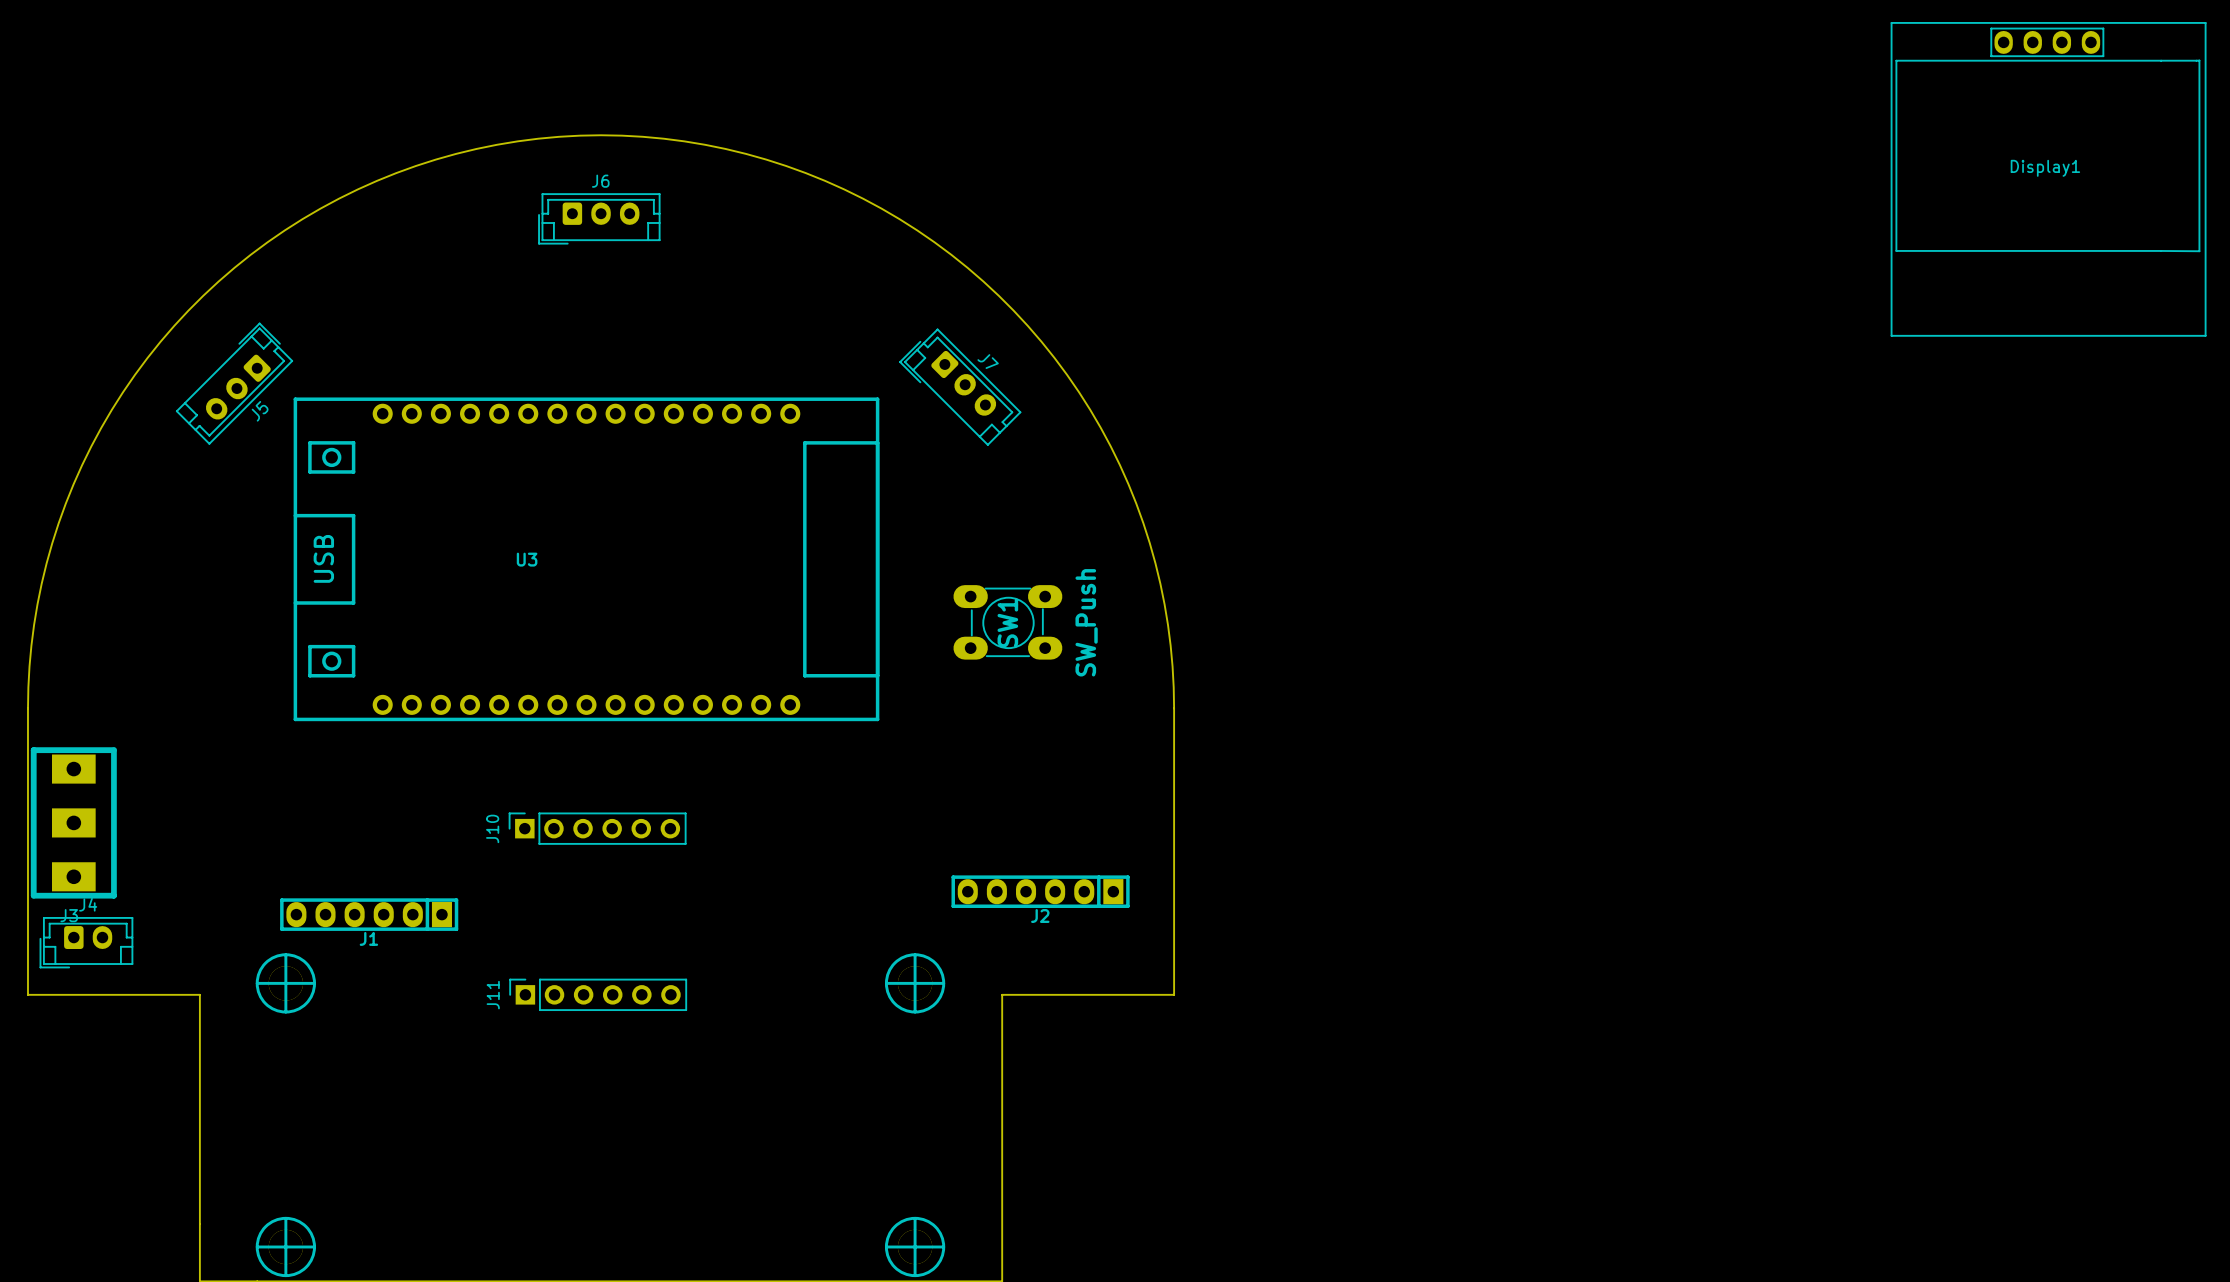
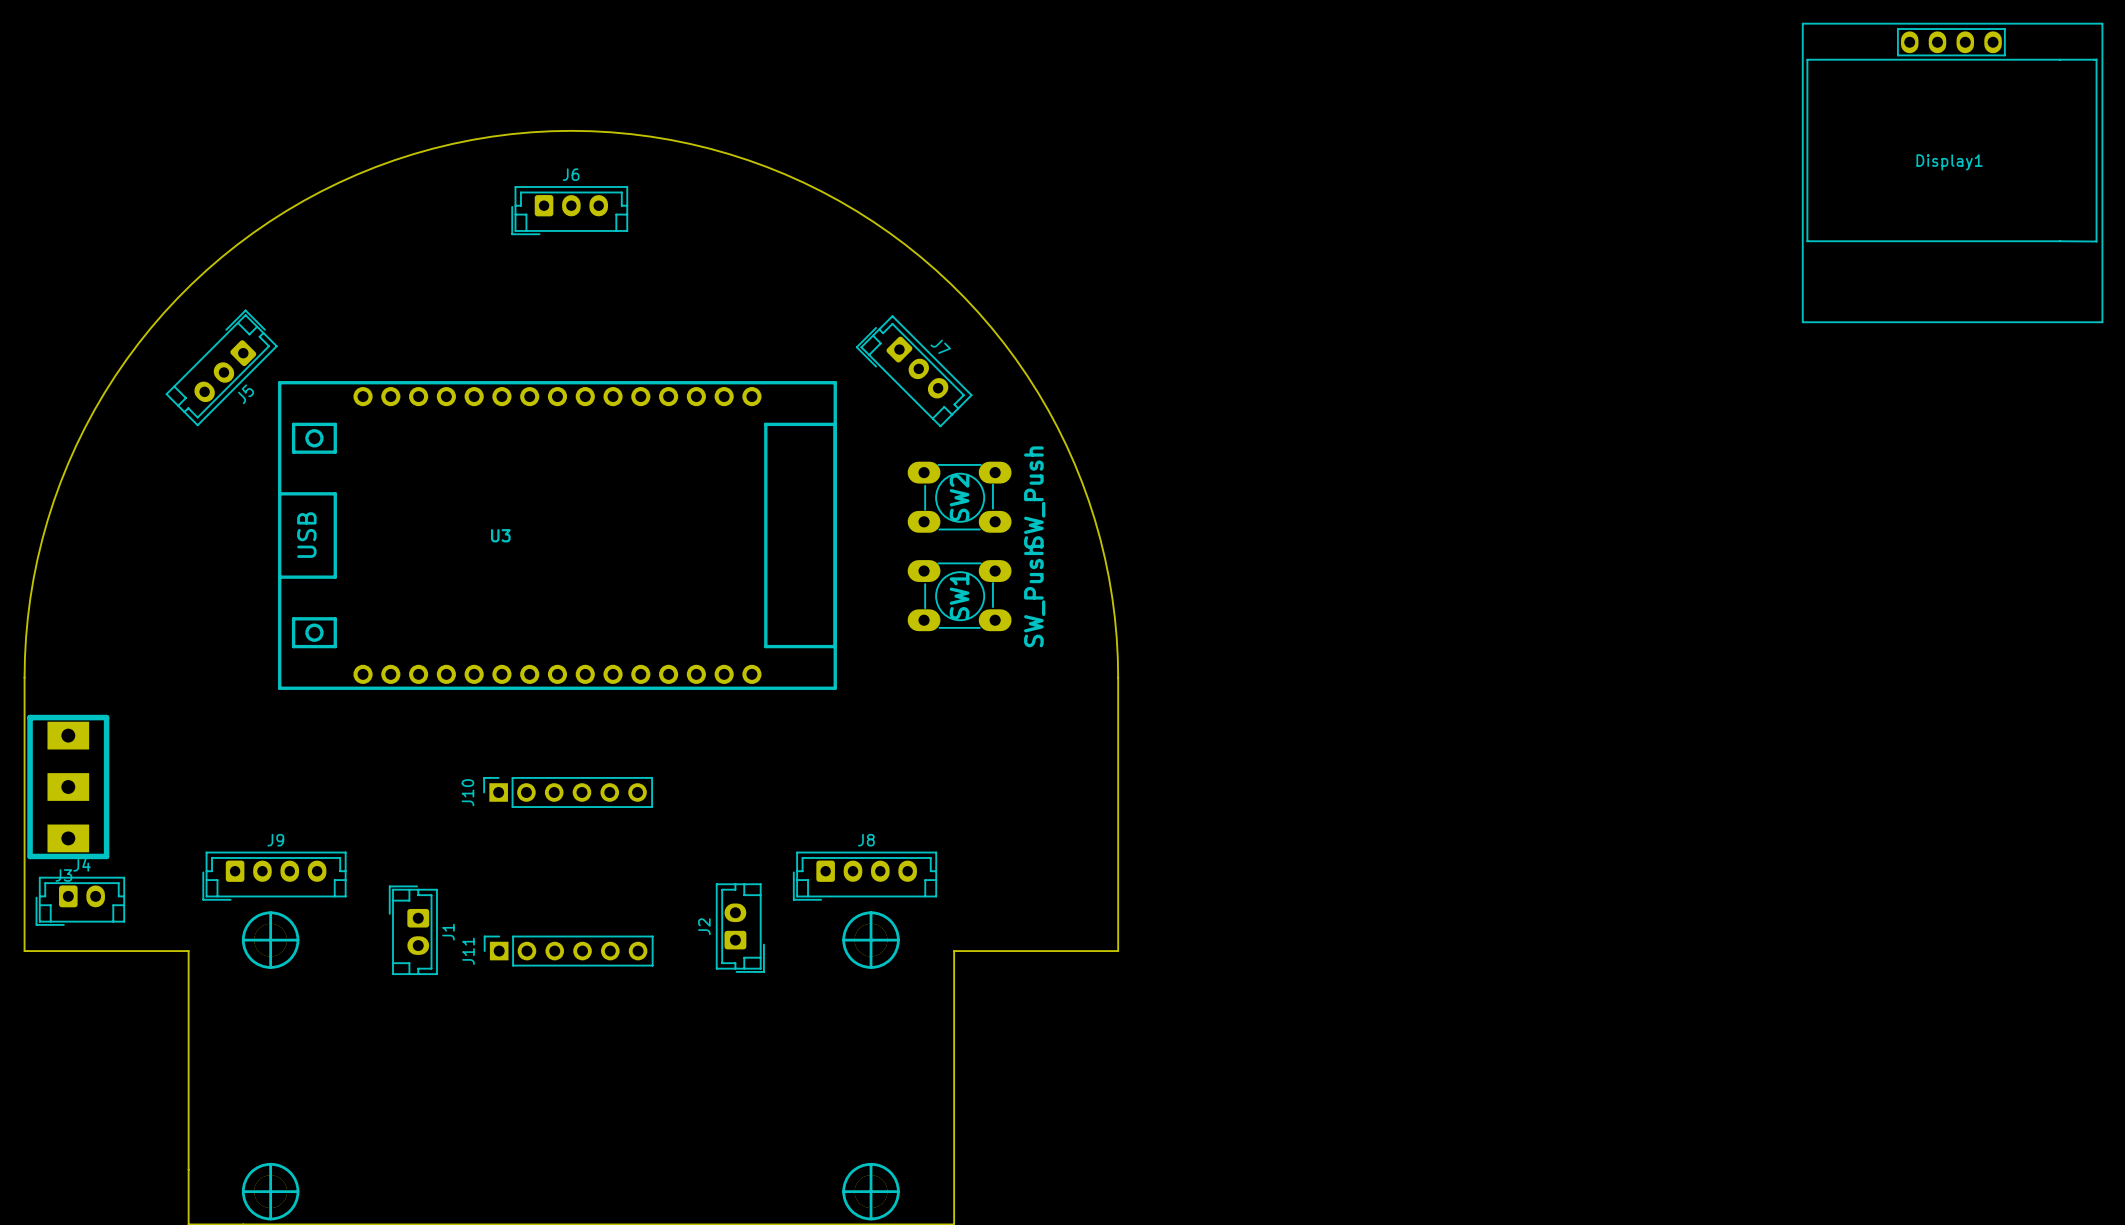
SW2: none -> SW_Push (959, 497)
J2 footprint: [951, 875, 1130, 908] -> [716, 883, 765, 973]
J1 footprint: [280, 898, 459, 931] -> [389, 885, 438, 975]
J9: none -> (274, 876)
J8: none -> (865, 876)
J2 name position: J2 (1040, 916) -> J2 (704, 926)
J1 name position: J1 (368, 938) -> J1 (448, 932)

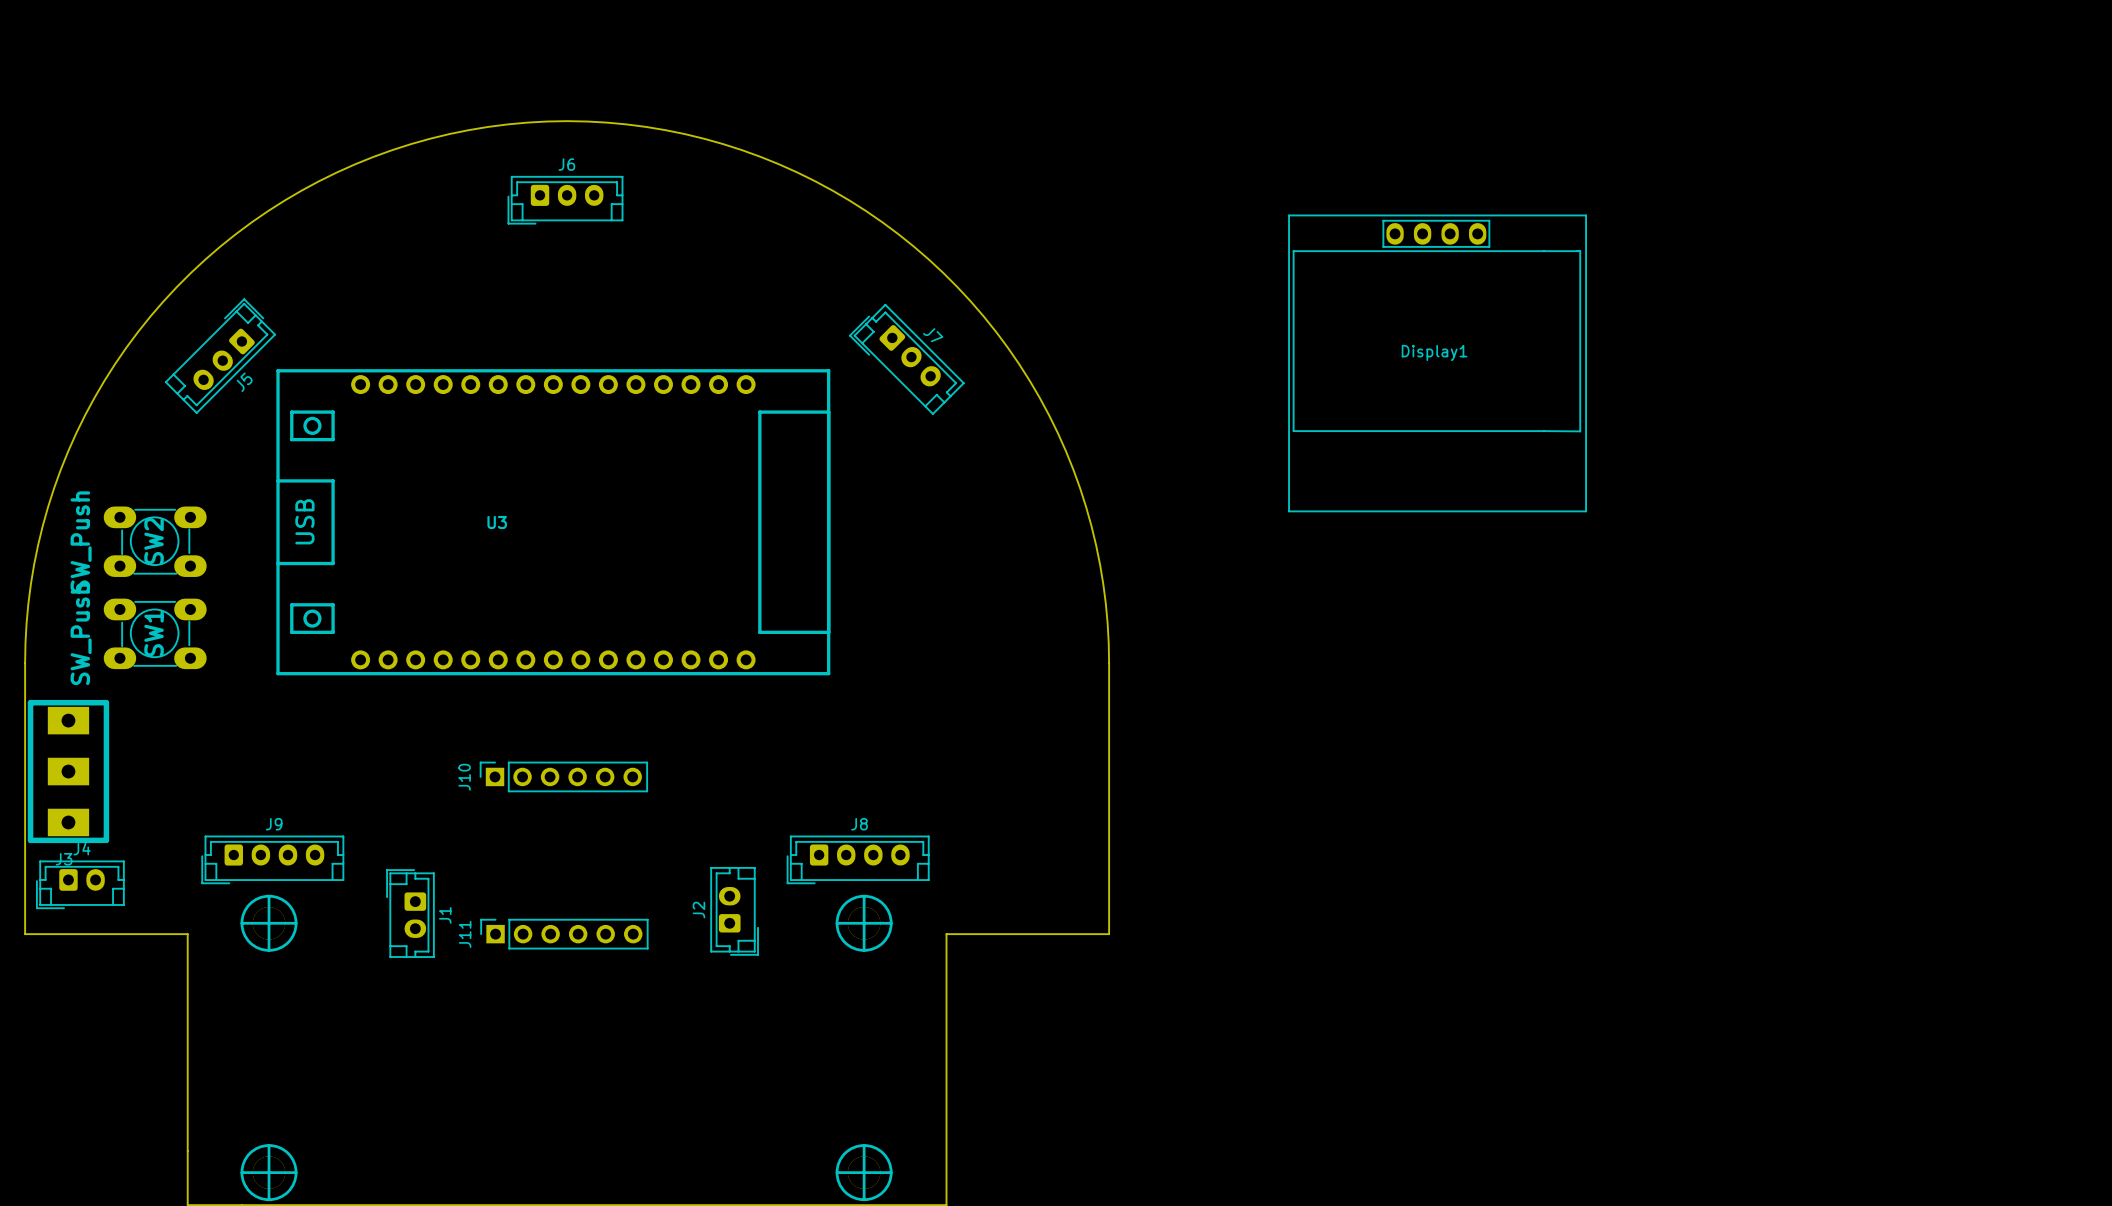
Display1 position: (1952, 172) -> (1437, 363)
SW2 rotation: 0° (959, 497) -> 180° (155, 541)
SW2 position: (959, 497) -> (155, 541)
SW1 rotation: 0° (959, 595) -> 180° (155, 633)
SW1 position: (959, 595) -> (155, 633)

